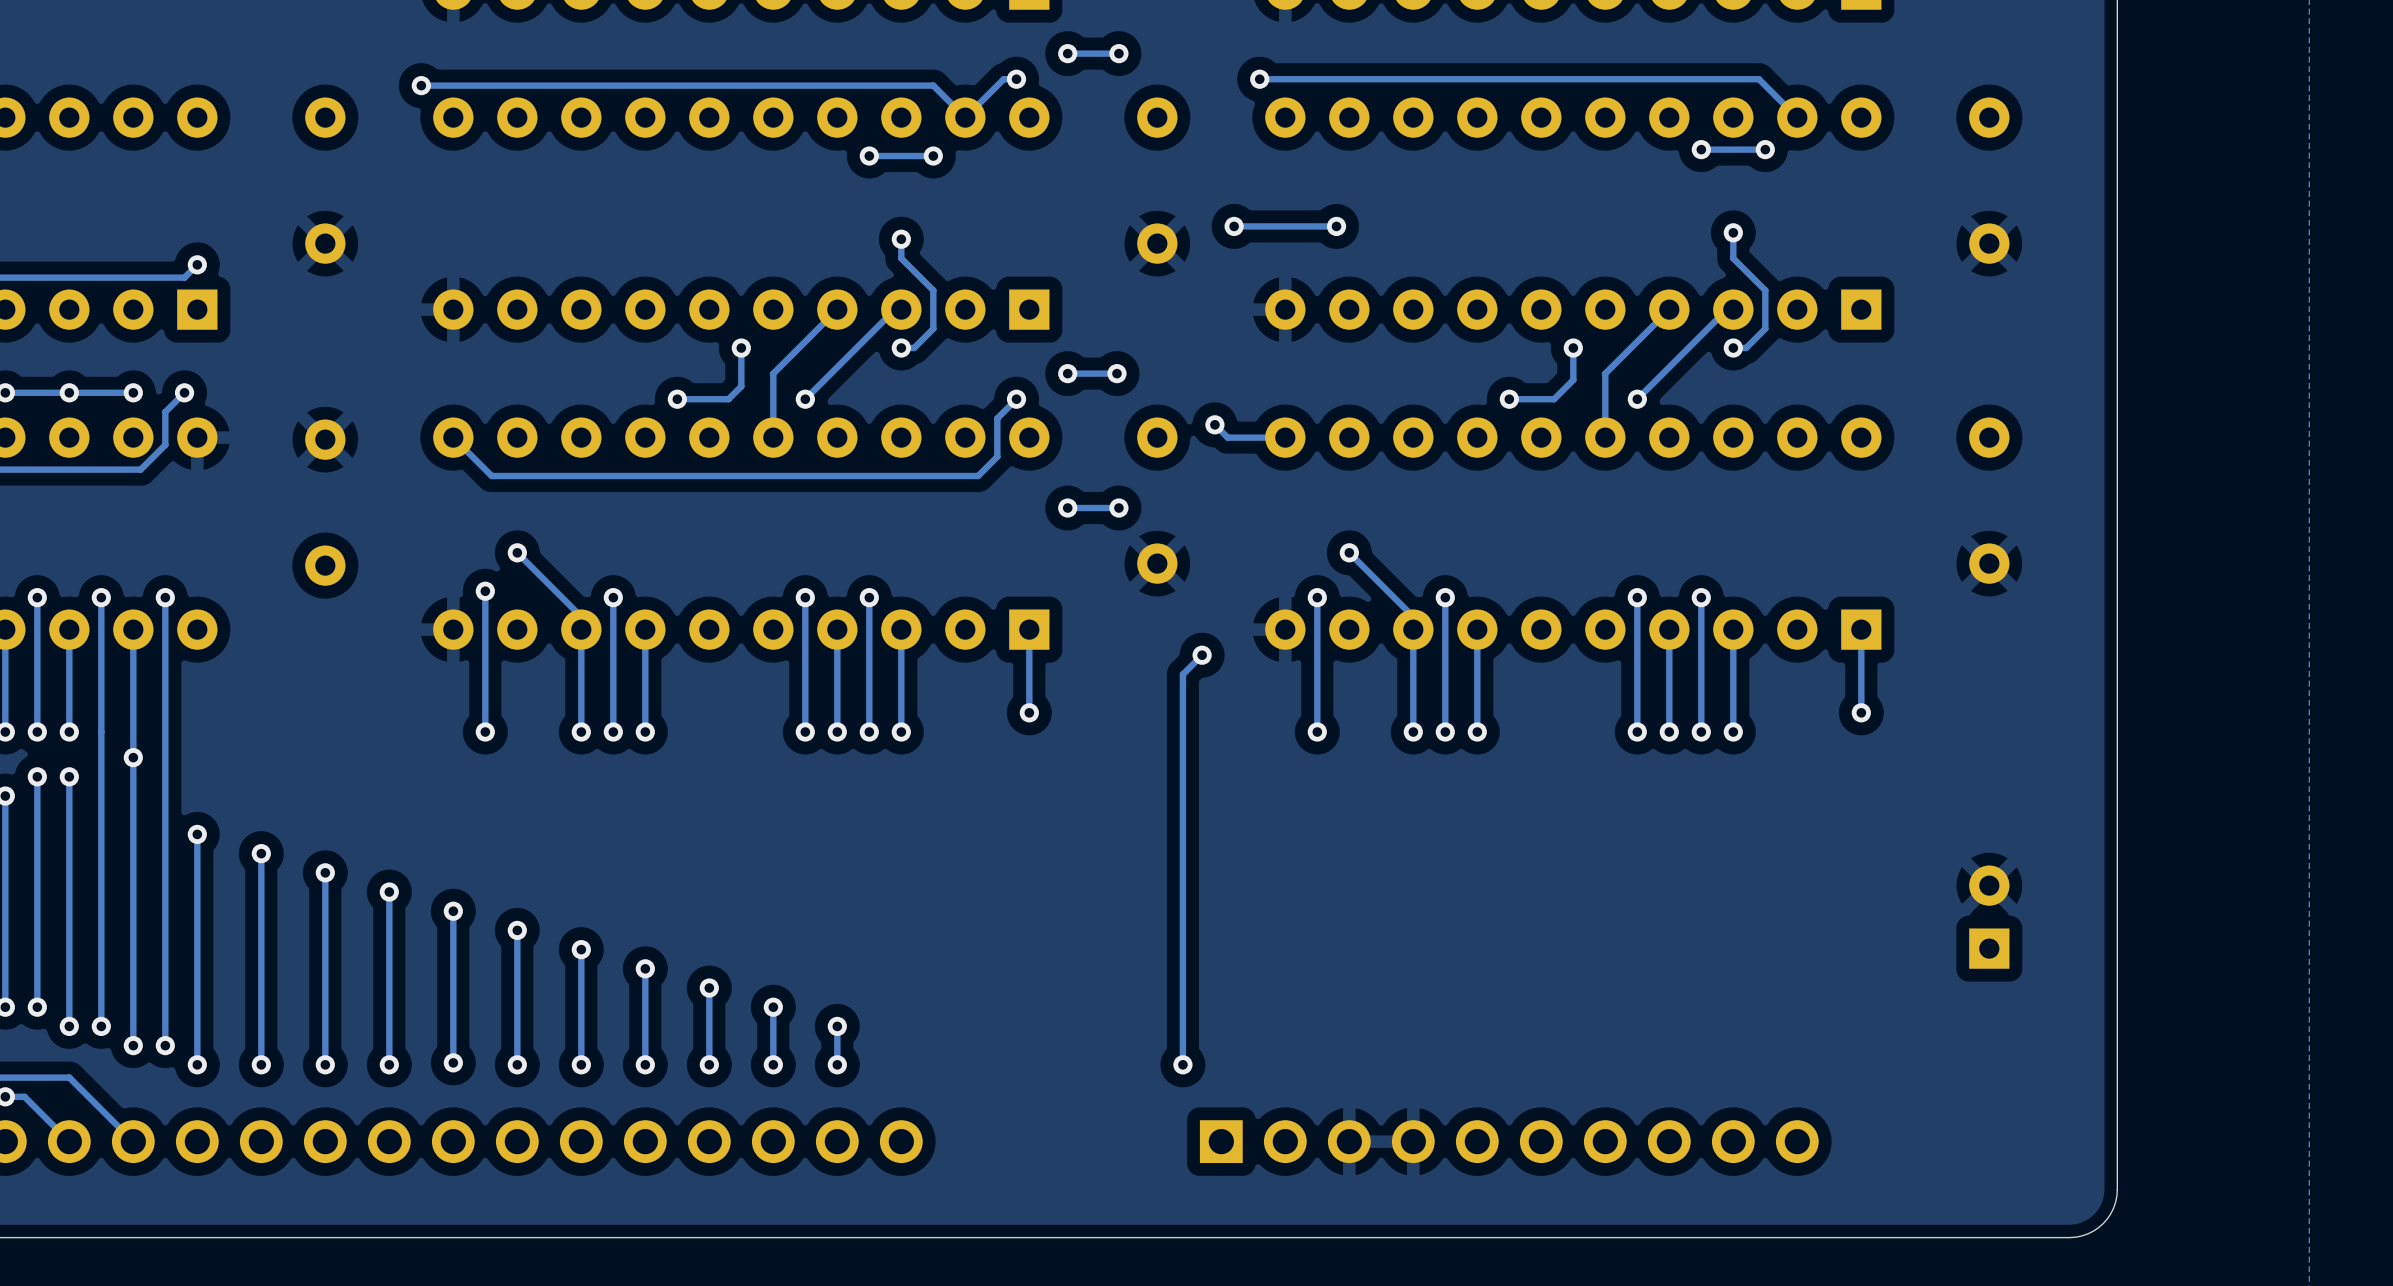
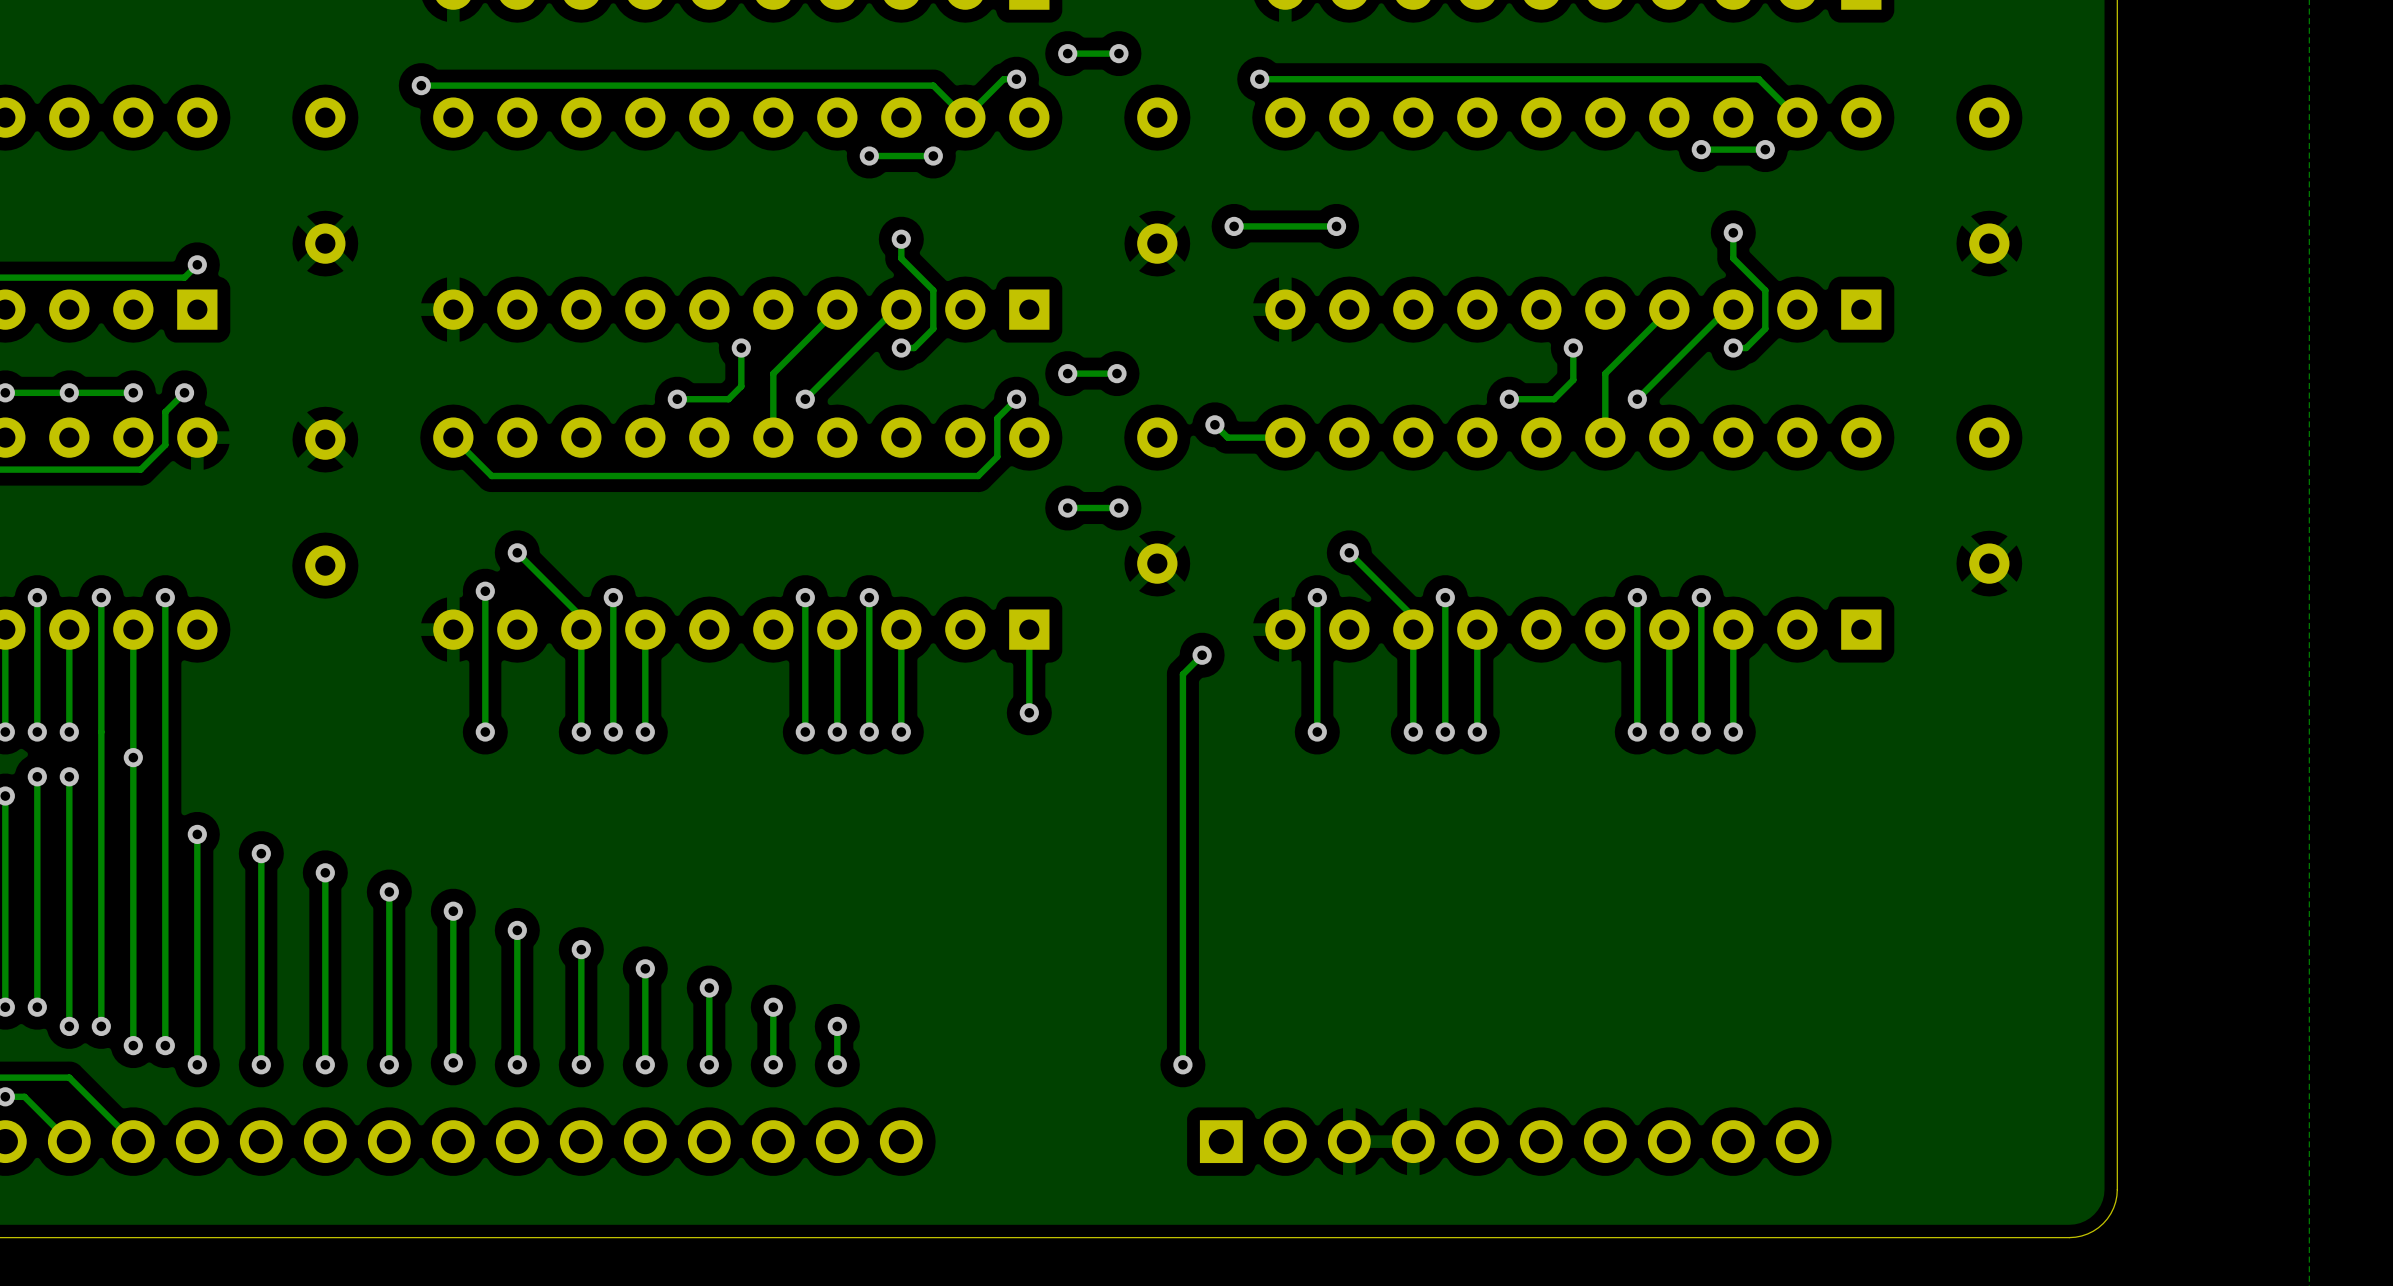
track: (1861, 629) (1861, 712) -> none
via: (1861, 712) -> none
part: (1989, 917) -> none

